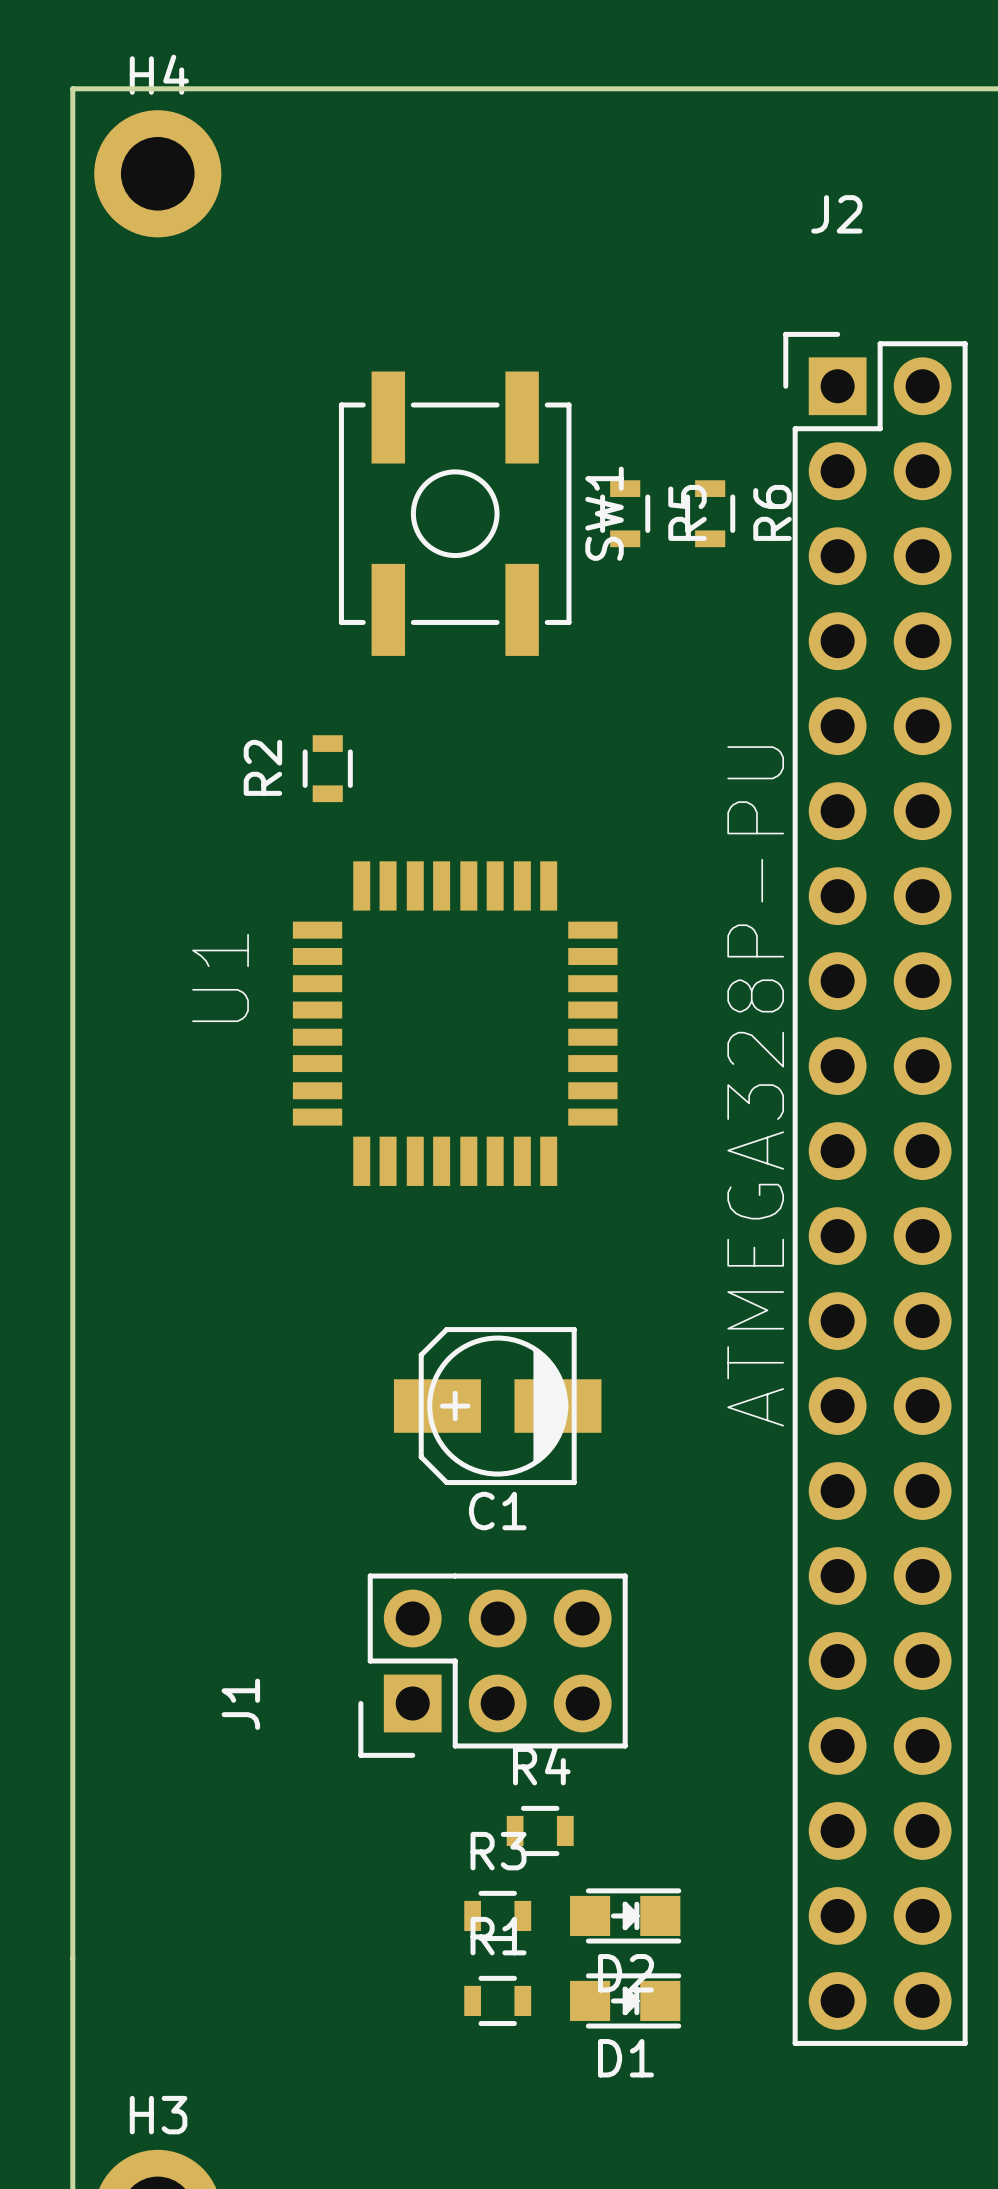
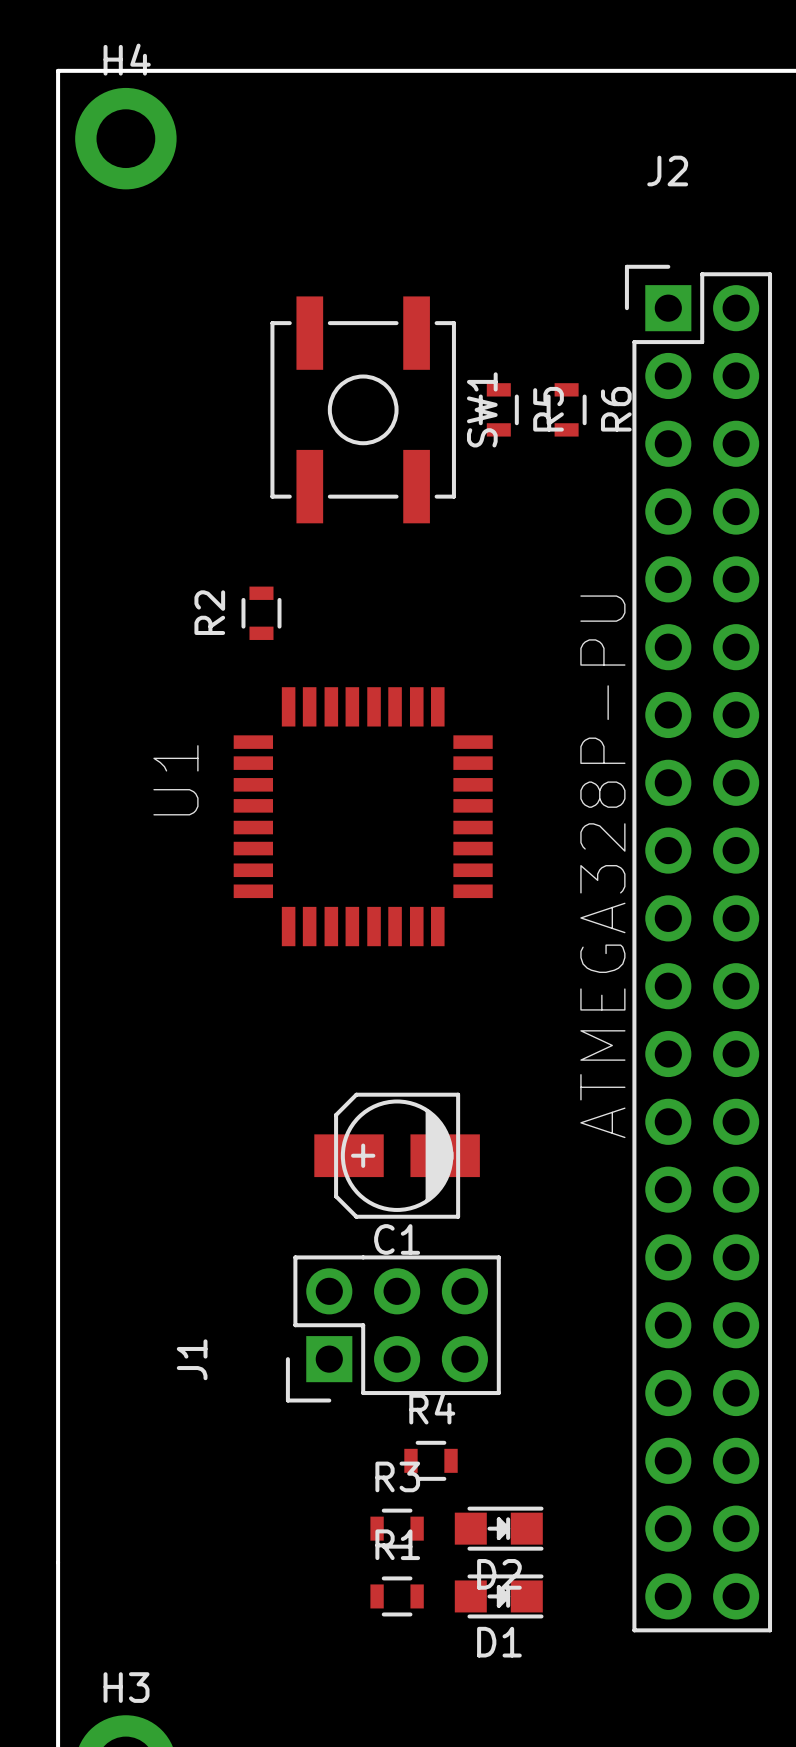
C1 position: (497, 1406) -> (397, 1155)

